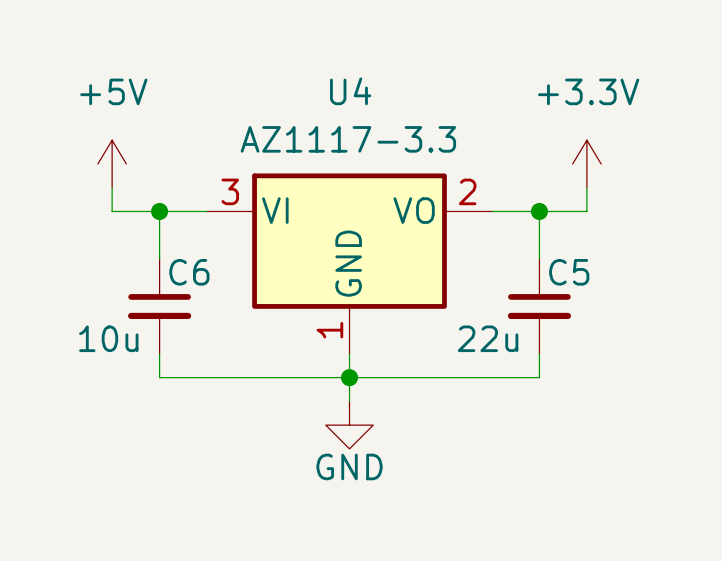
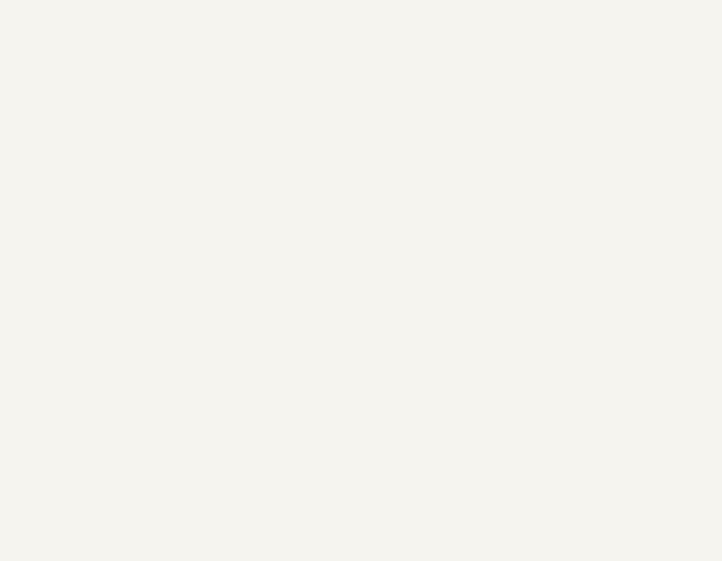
power symbol: +5V (112, 163) -> none
power symbol: +3.3V (586, 163) -> none
wire: (112, 187) (112, 211) (207, 211) -> none
wire: (586, 187) (586, 211) (491, 211) -> none
wire: (159, 211) (159, 258) -> none
junction: (159, 211) -> none
wire: (539, 211) (539, 258) -> none
junction: (539, 211) -> none
U4: AZ1117-3.3 (349, 263) -> none
C6: 10u (159, 306) -> none
C5: 22u (539, 306) -> none
wire: (159, 353) (159, 377) (539, 377) (539, 353) -> none
wire: (349, 353) (349, 401) -> none
junction: (349, 377) -> none
power symbol: GND (349, 425) -> none

